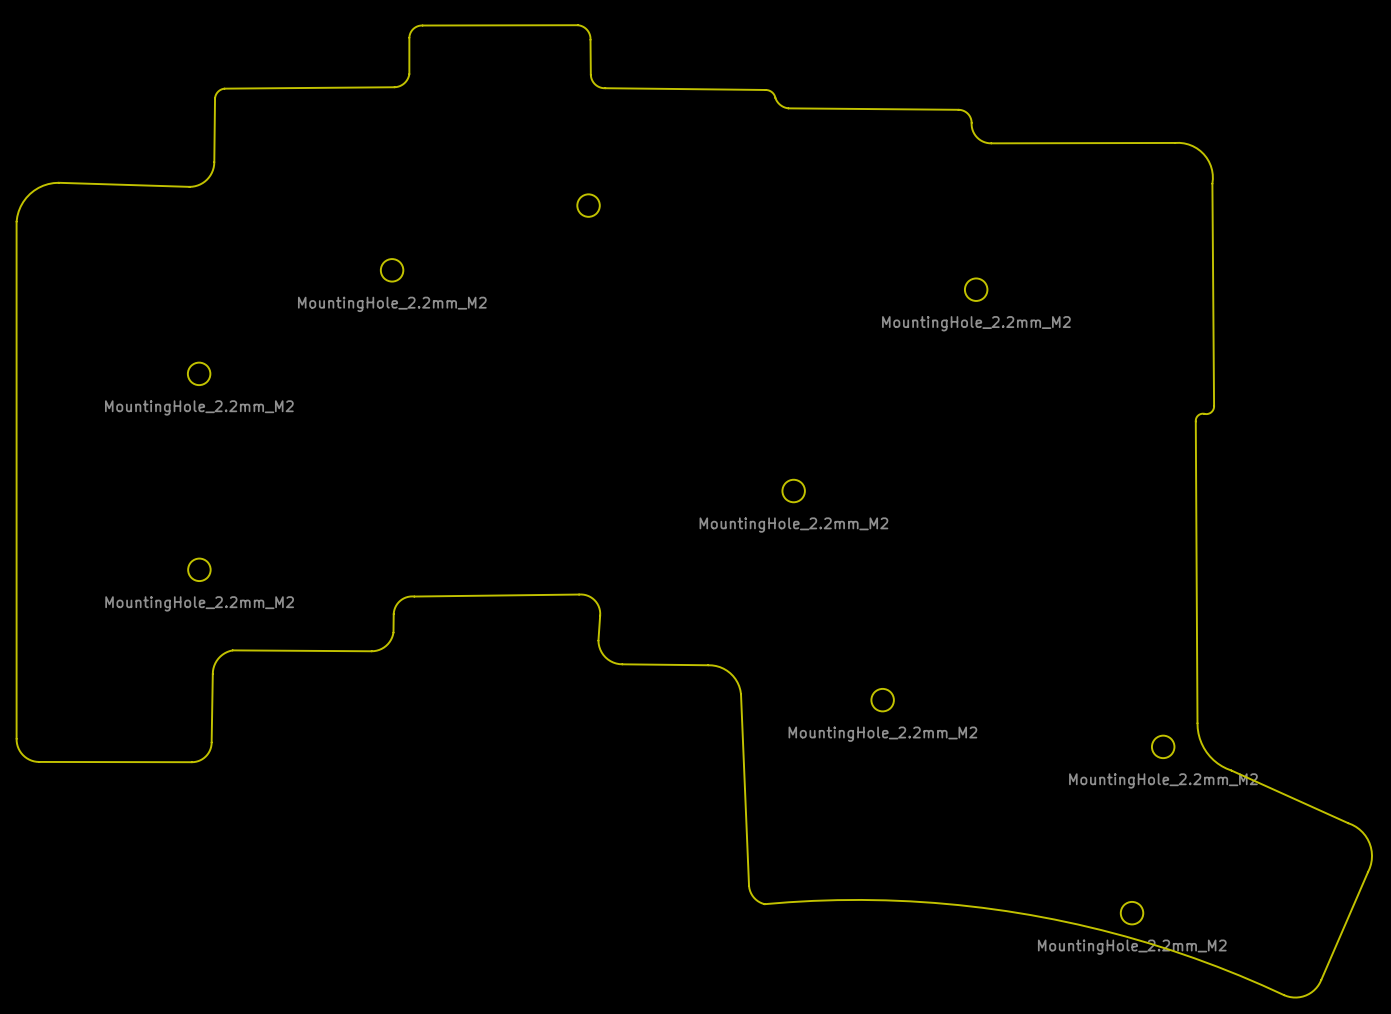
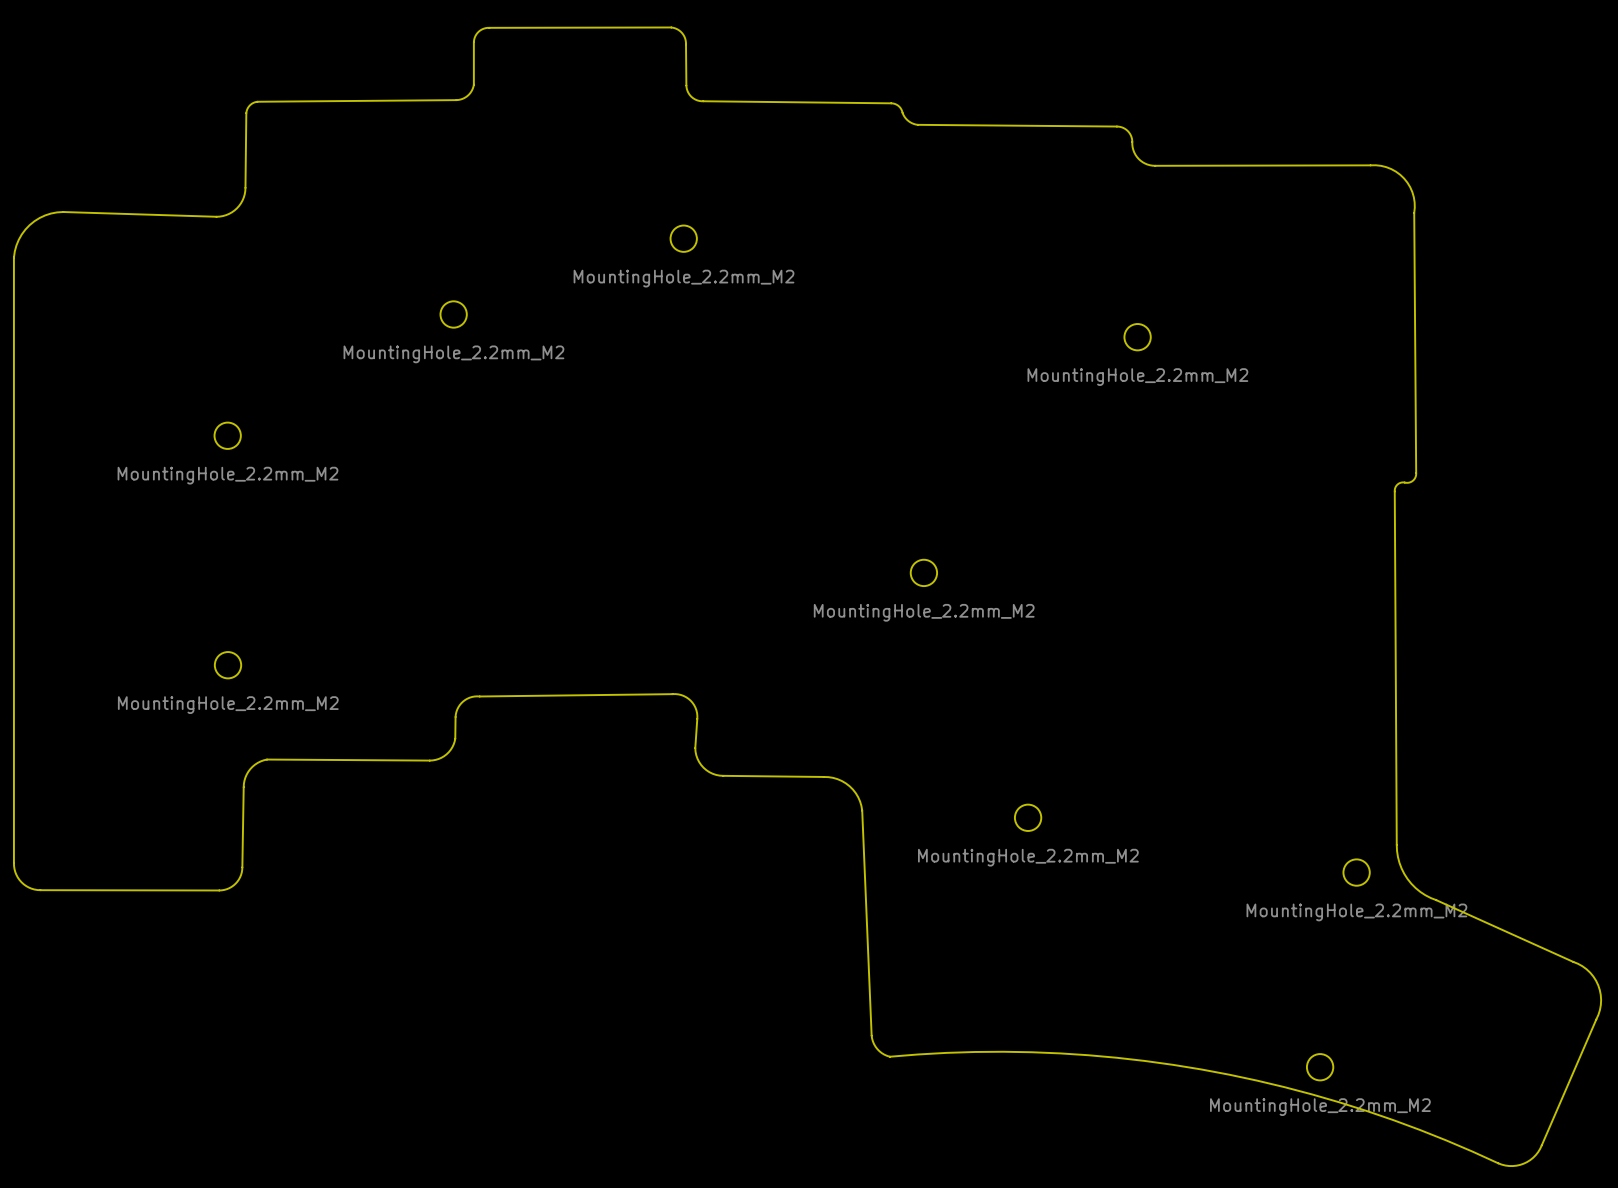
part value: none -> MountingHole_2.2mm_M2 (684, 278)

